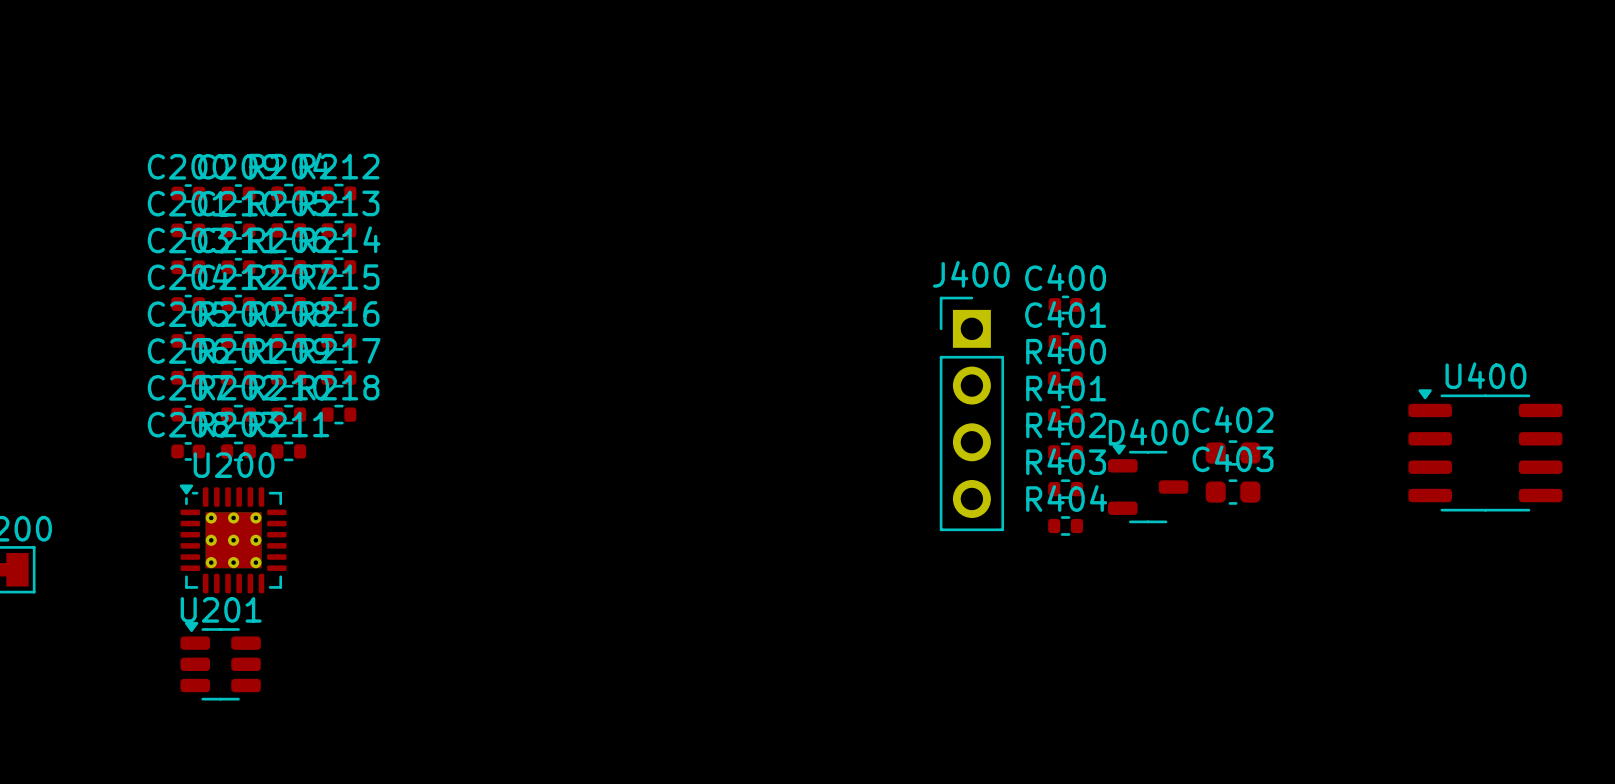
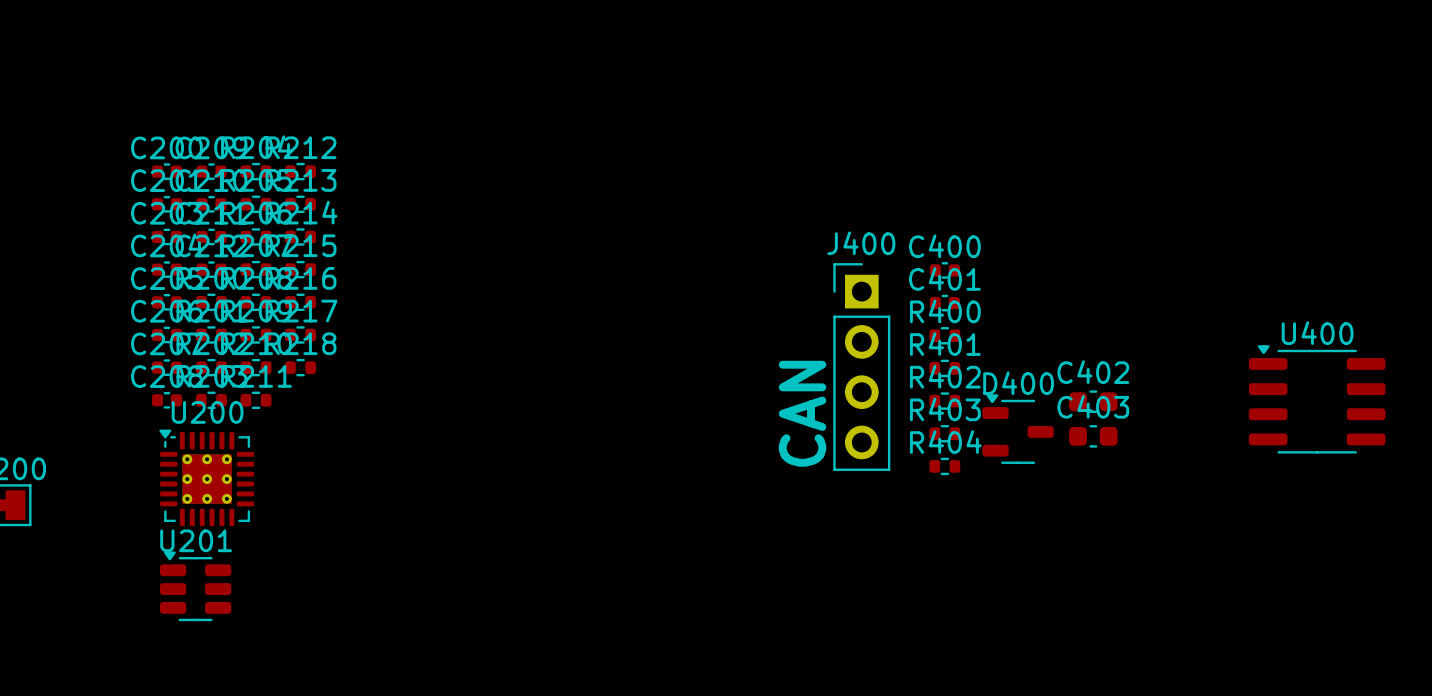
text: none -> CAN (802, 413)

